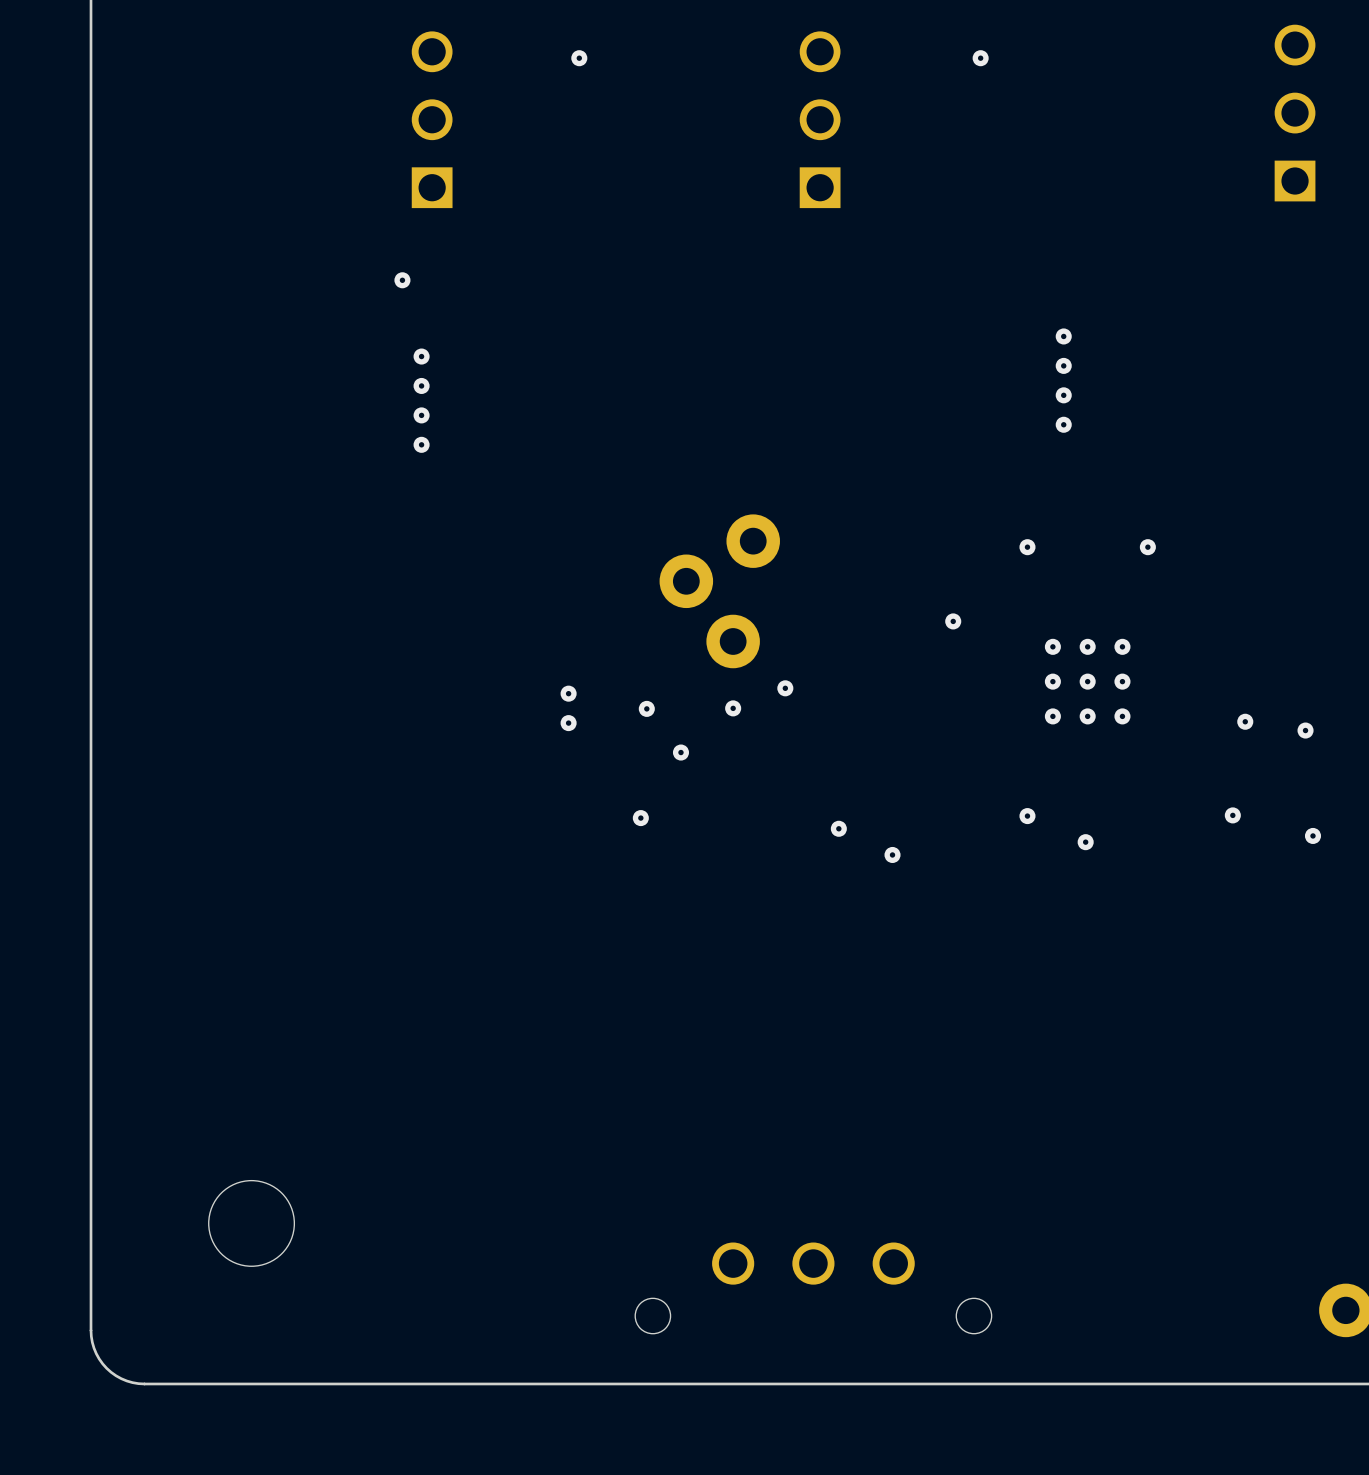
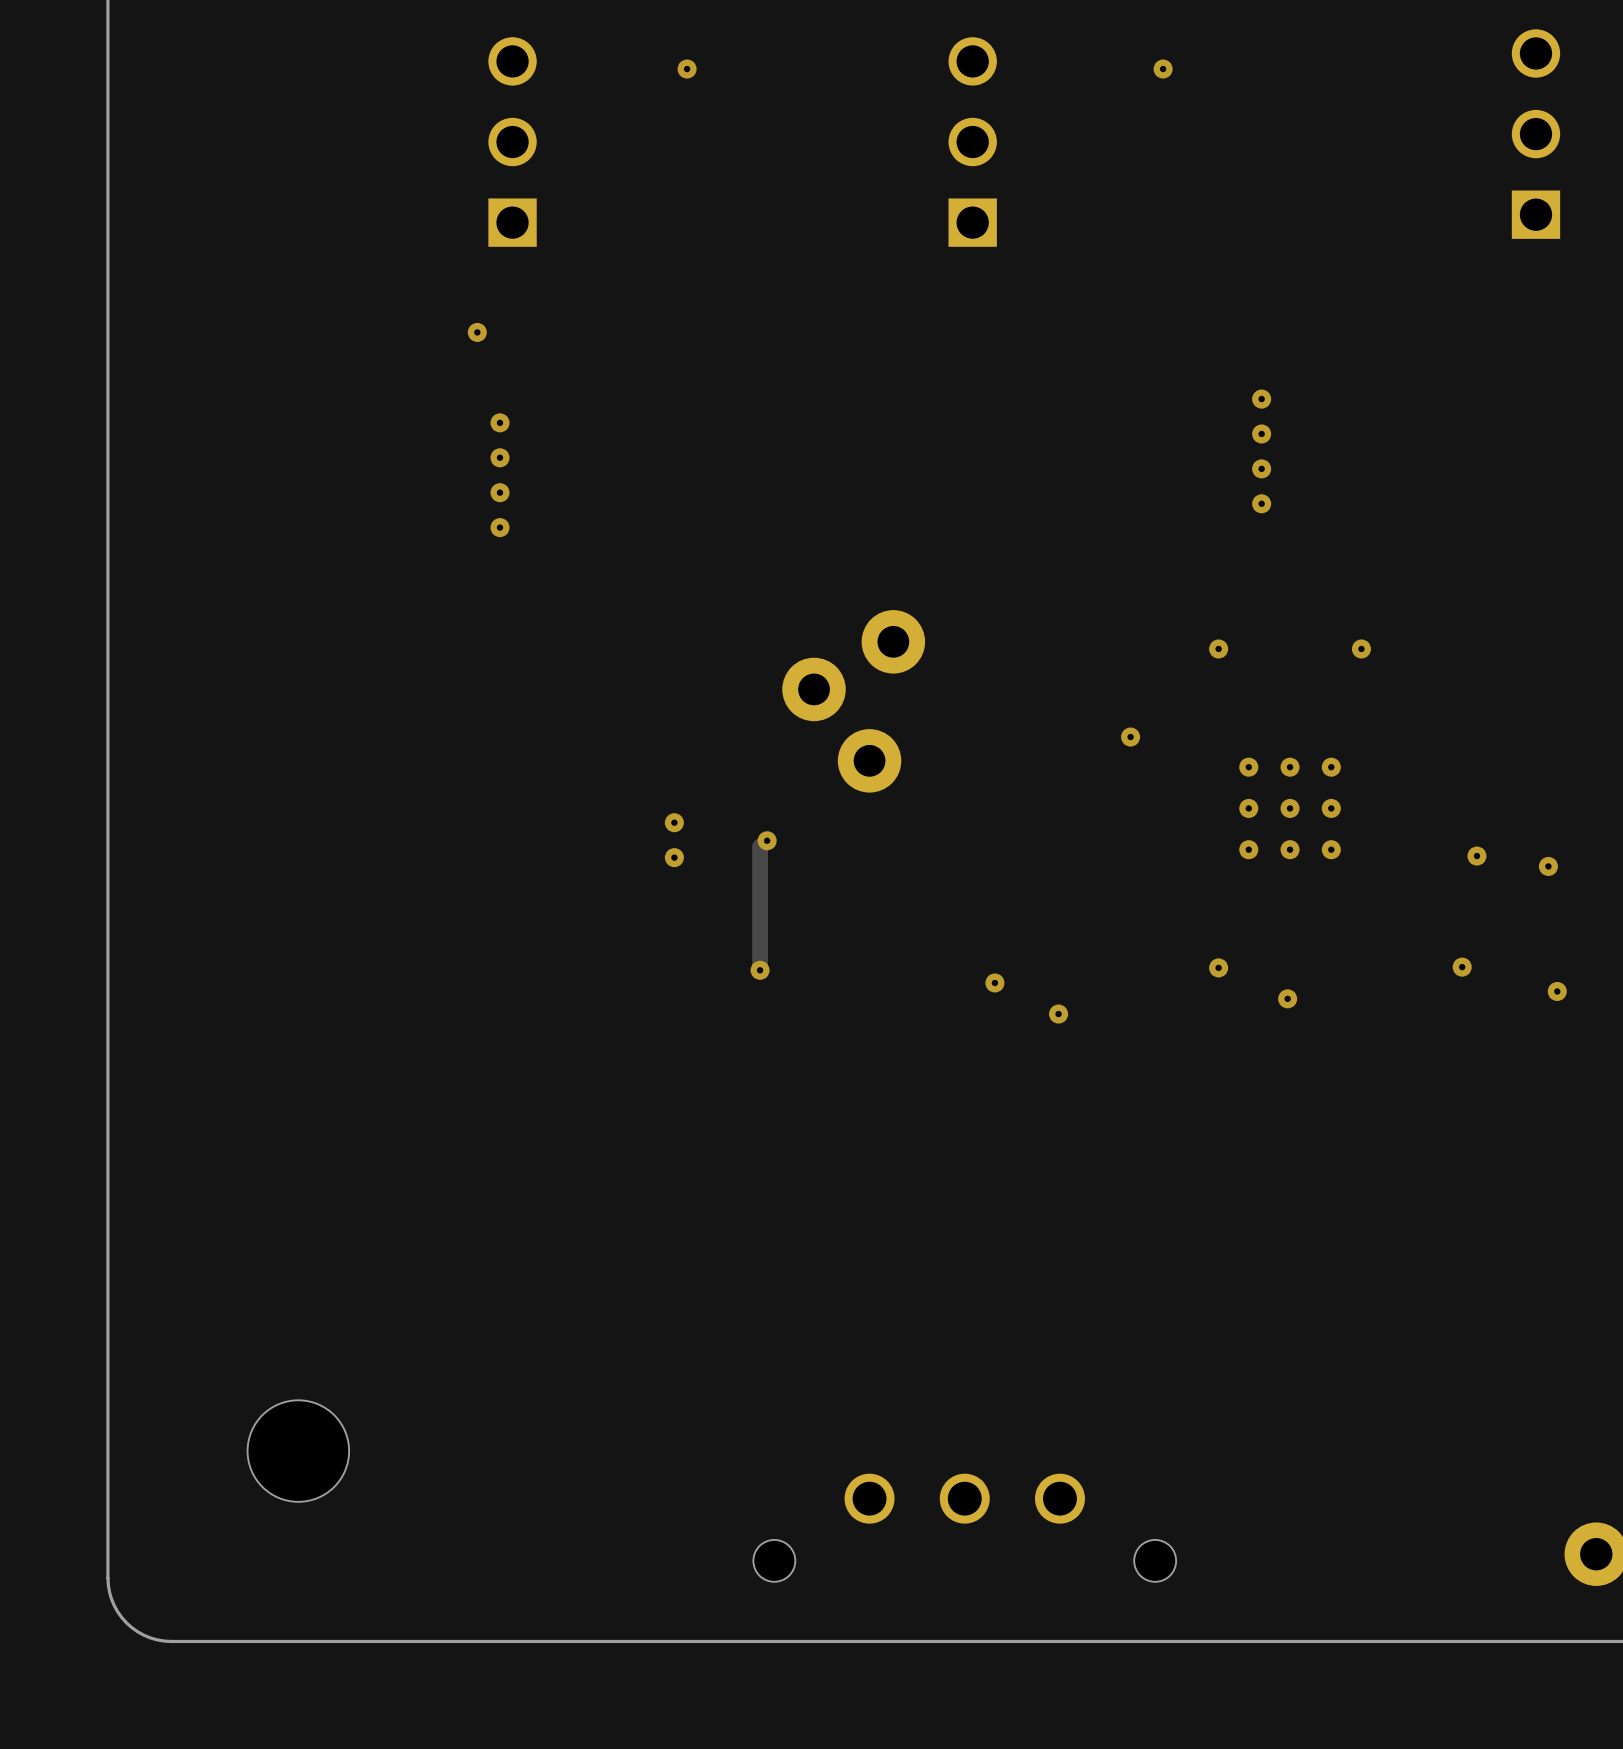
via: (785, 688) -> none
via: (733, 708) -> none
track: none -> (760, 846) (760, 970)
via: (680, 752) -> none

